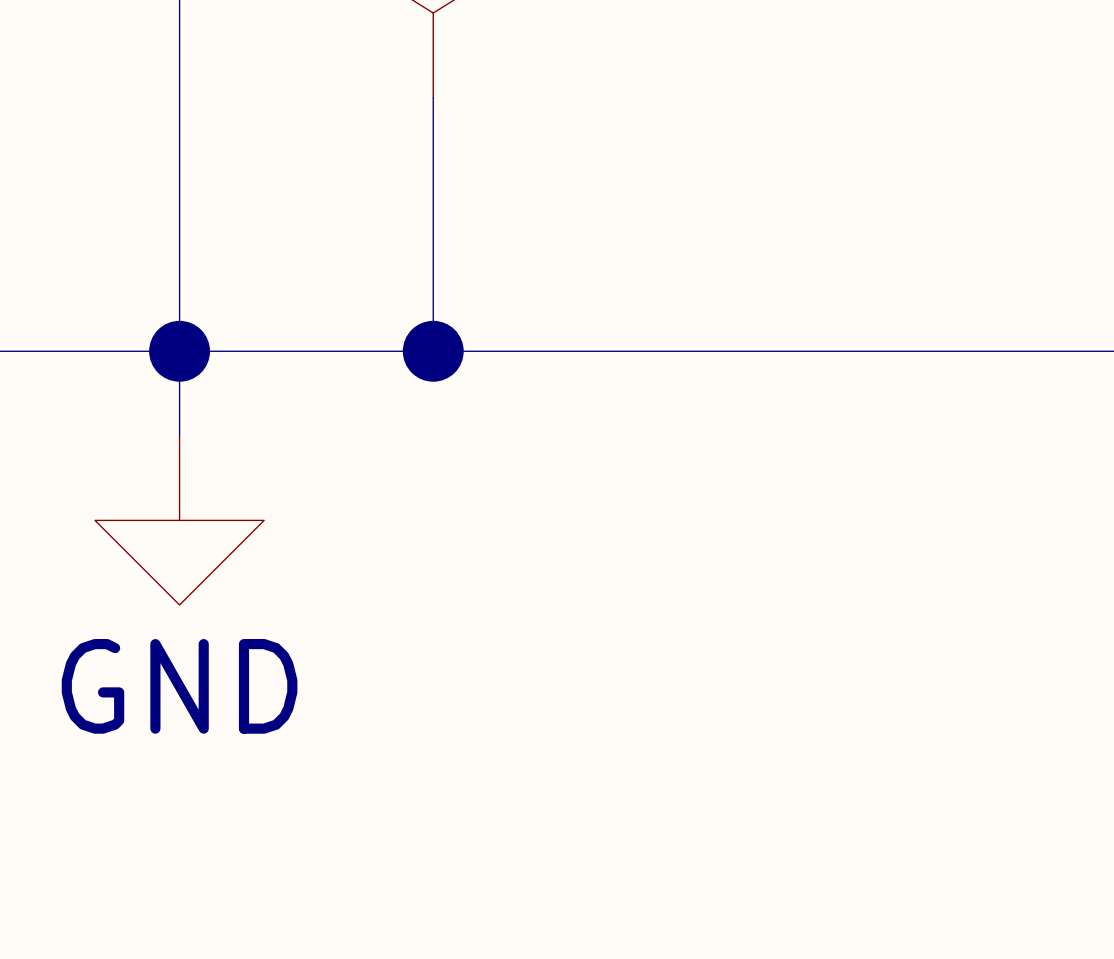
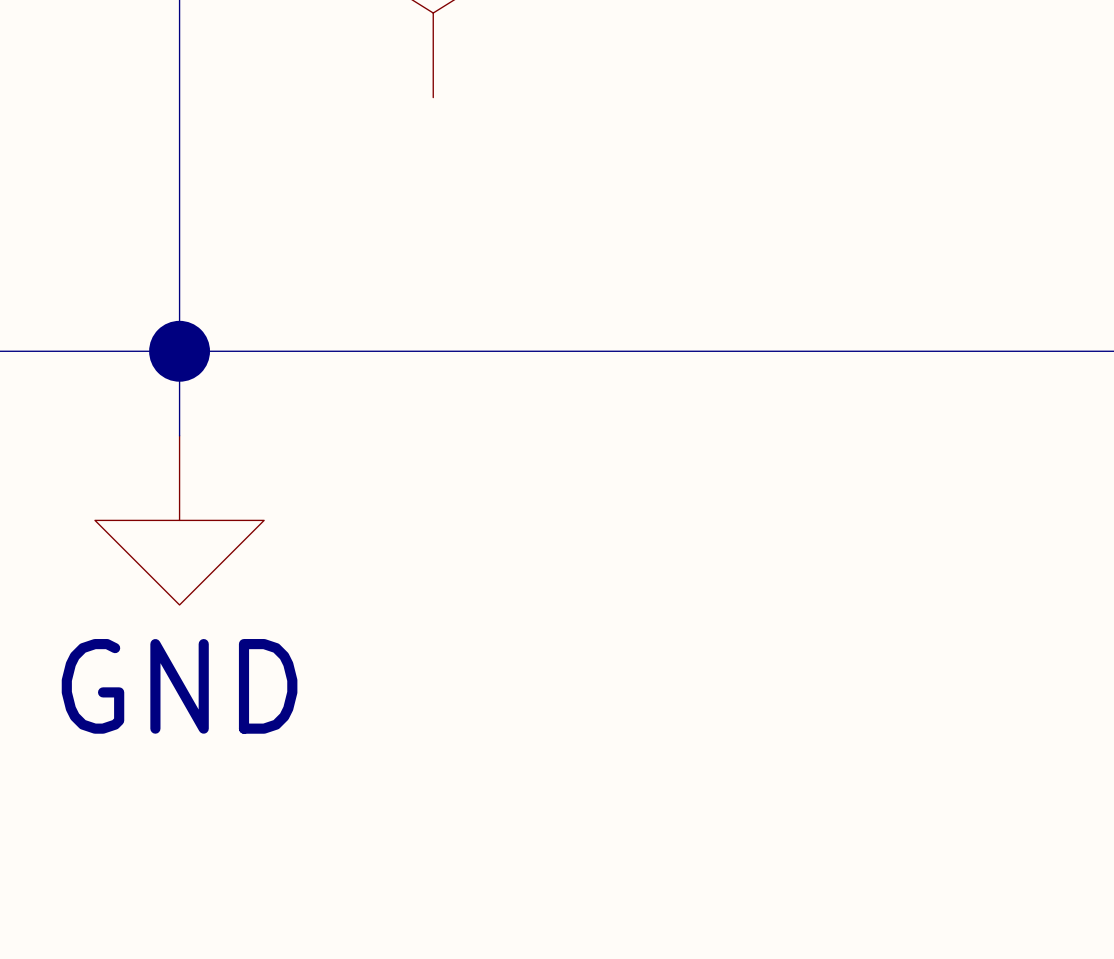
wire: (433, 97) (433, 351) -> none
junction: (433, 351) -> none

